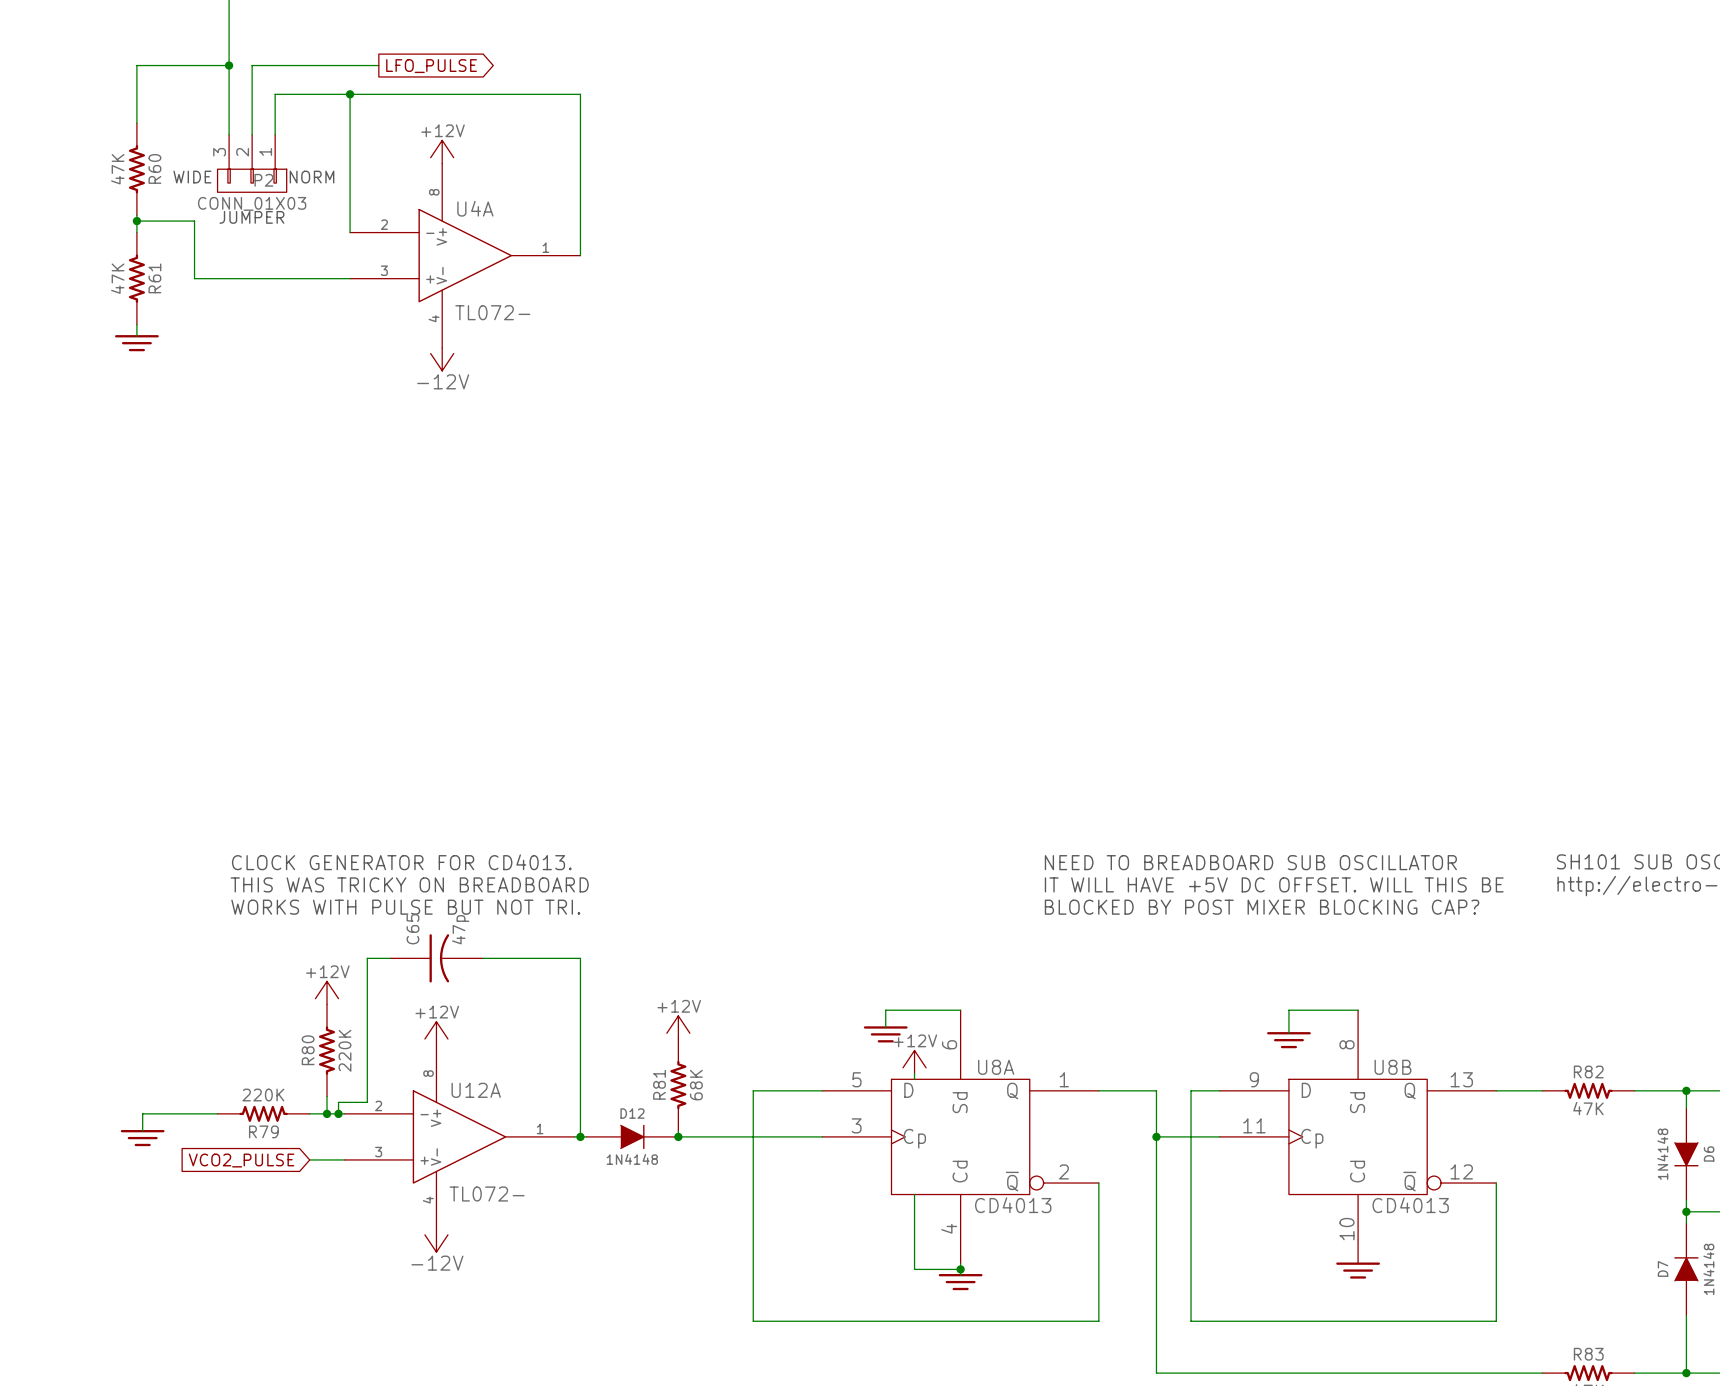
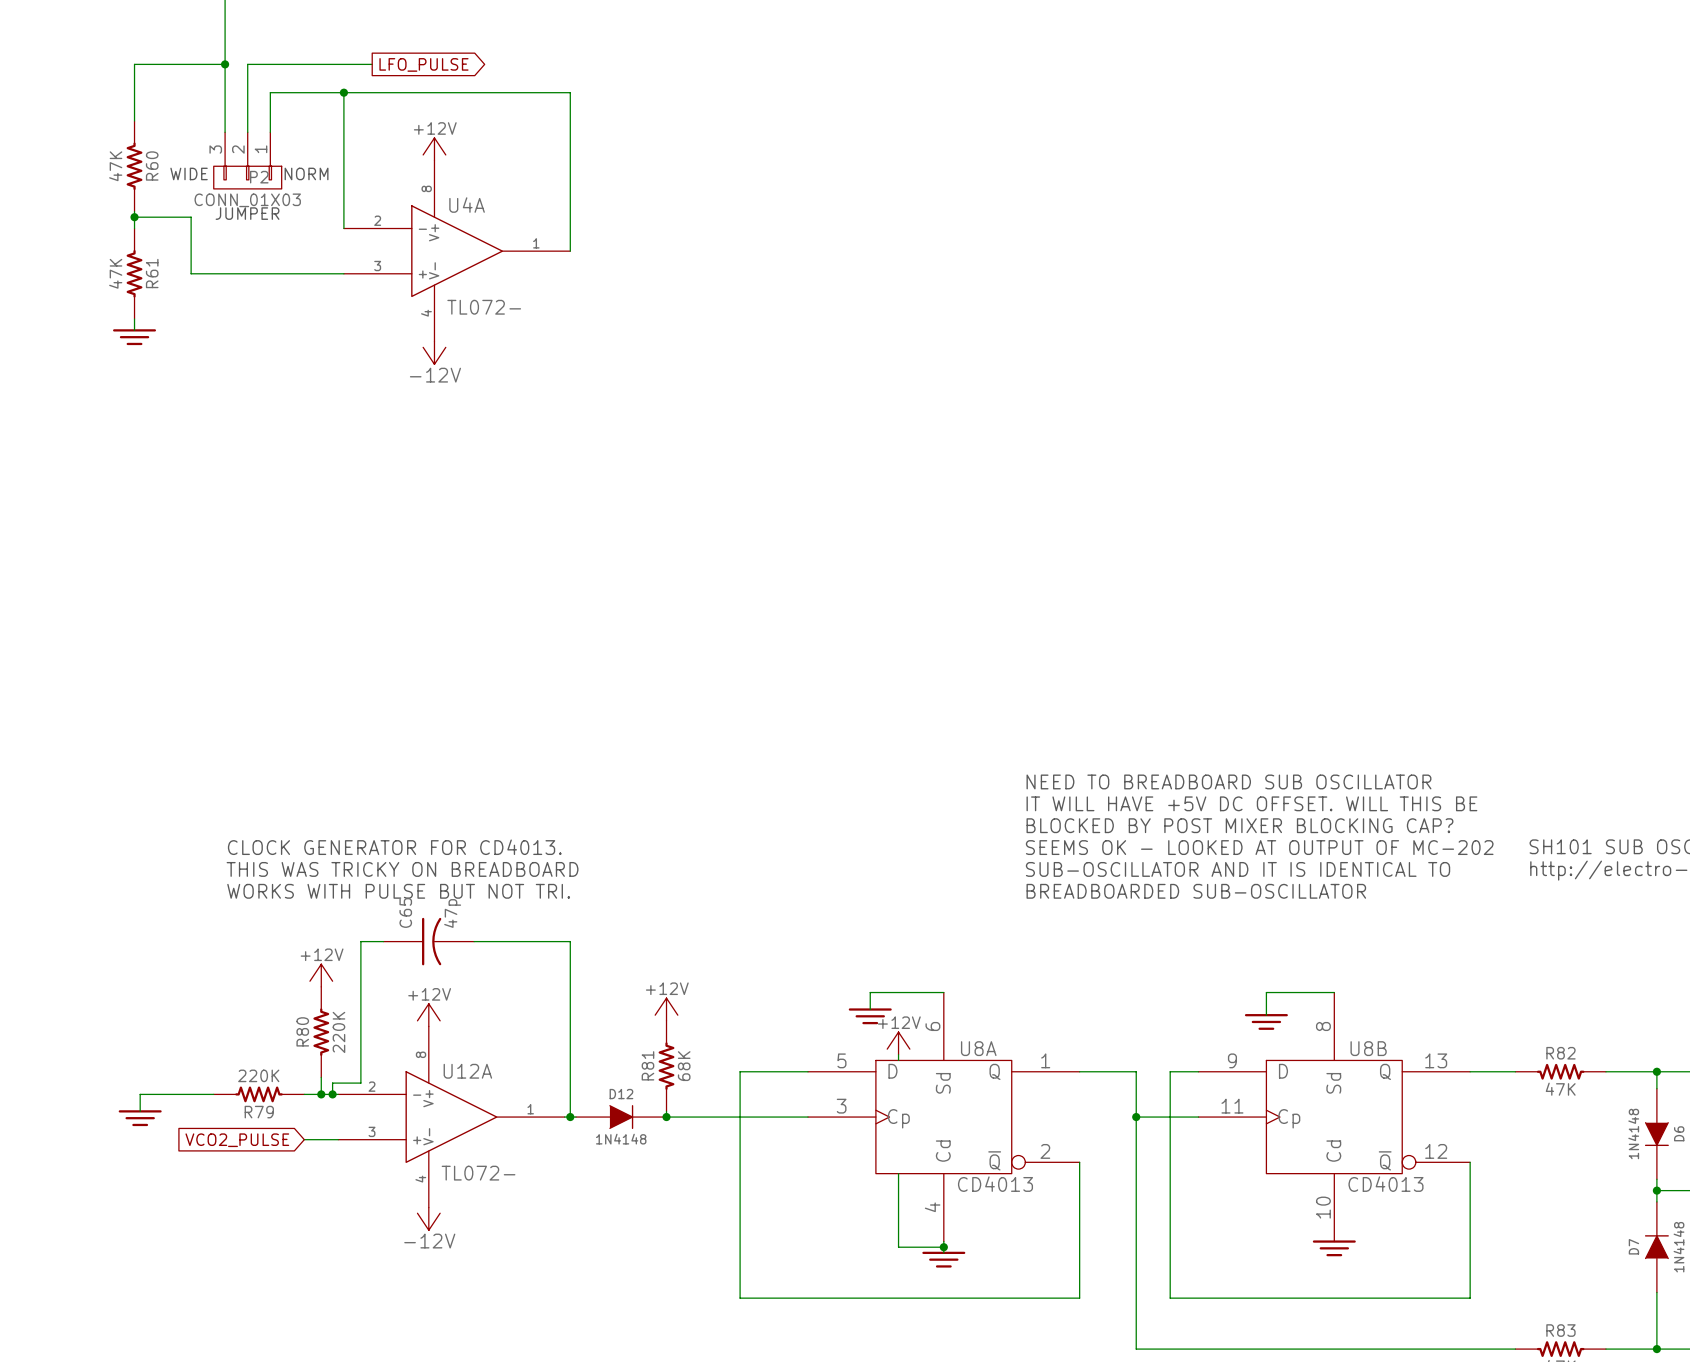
text: none -> NEED TO BREADBOARD SUB OSCILLATOR (1228, 781)
text: none -> IT WILL HAVE +5V DC OFFSET. WILL THIS BE (1251, 803)
text: none -> BLOCKED BY POST MIXER BLOCKING CAP? (1239, 825)
text: NEED TO BREADBOARD SUB OSCILLATOR (1250, 862) -> SEEMS OK - LOOKED AT OUTPUT OF MC-202 (1259, 847)
text: IT WILL HAVE +5V DC OFFSET. WILL THIS BE (1274, 884) -> SUB-OSCILLATOR AND IT IS IDENTICAL TO (1238, 869)
text: BLOCKED BY POST MIXER BLOCKING CAP? (1262, 907) -> BREADBOARDED SUB-OSCILLATOR (1196, 891)

